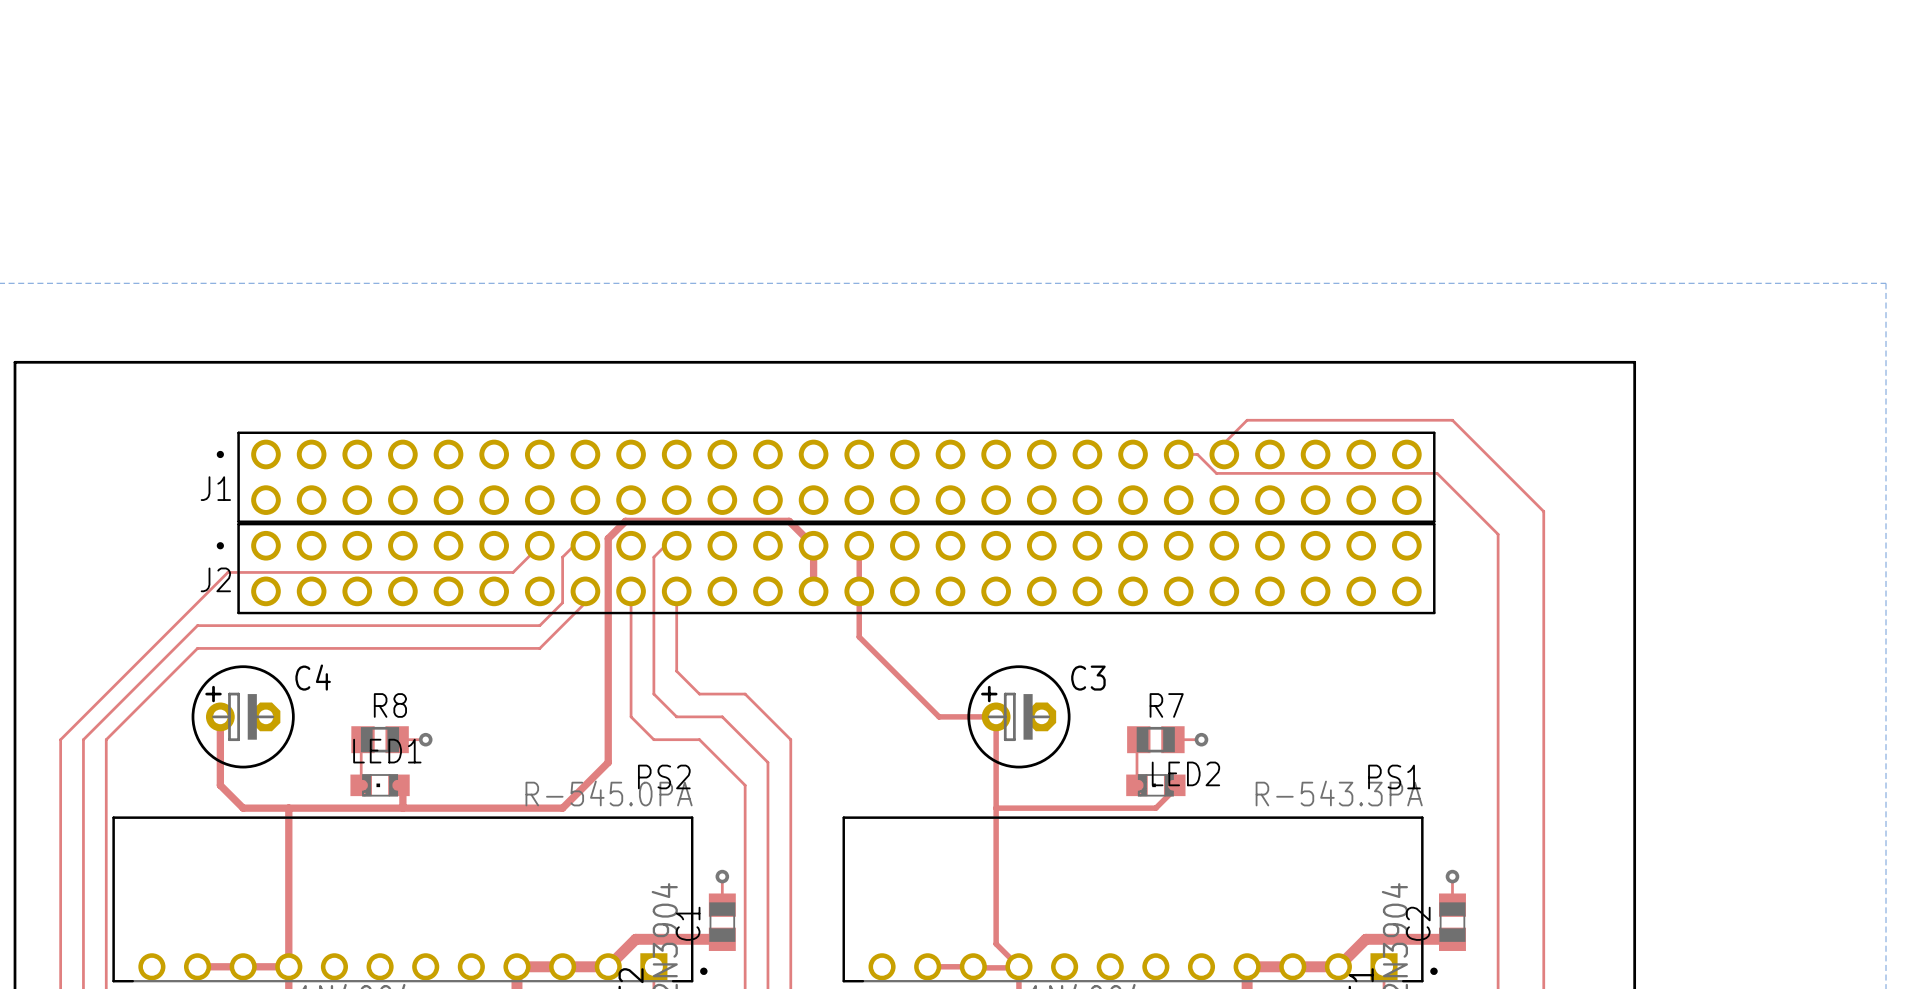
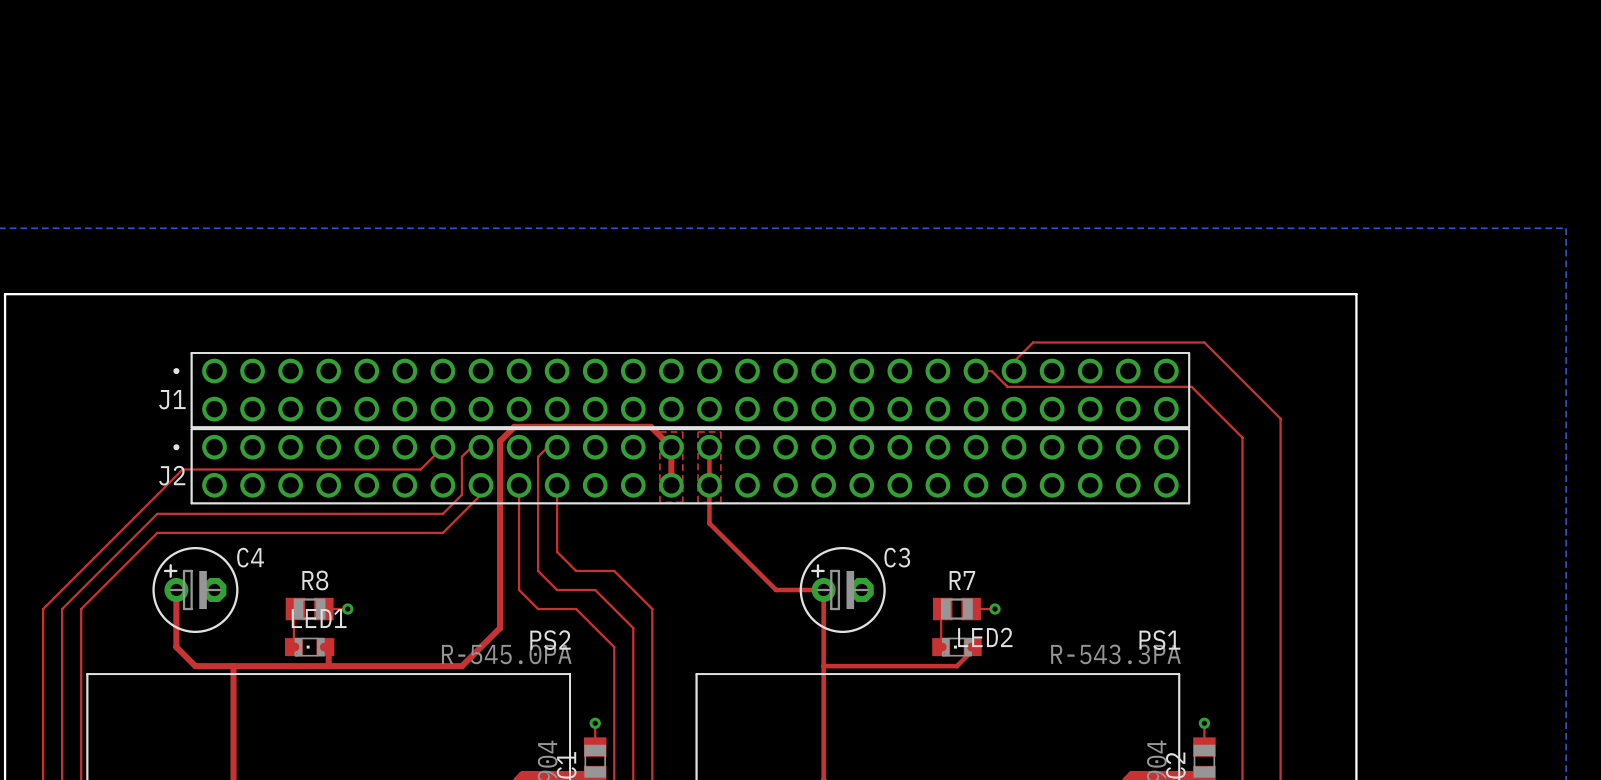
top zone outline: none -> (659, 431) (659, 502) (682, 502) (682, 431) (659, 431)
top zone outline: none -> (698, 431) (720, 431) (720, 502) (698, 502) (698, 431)

